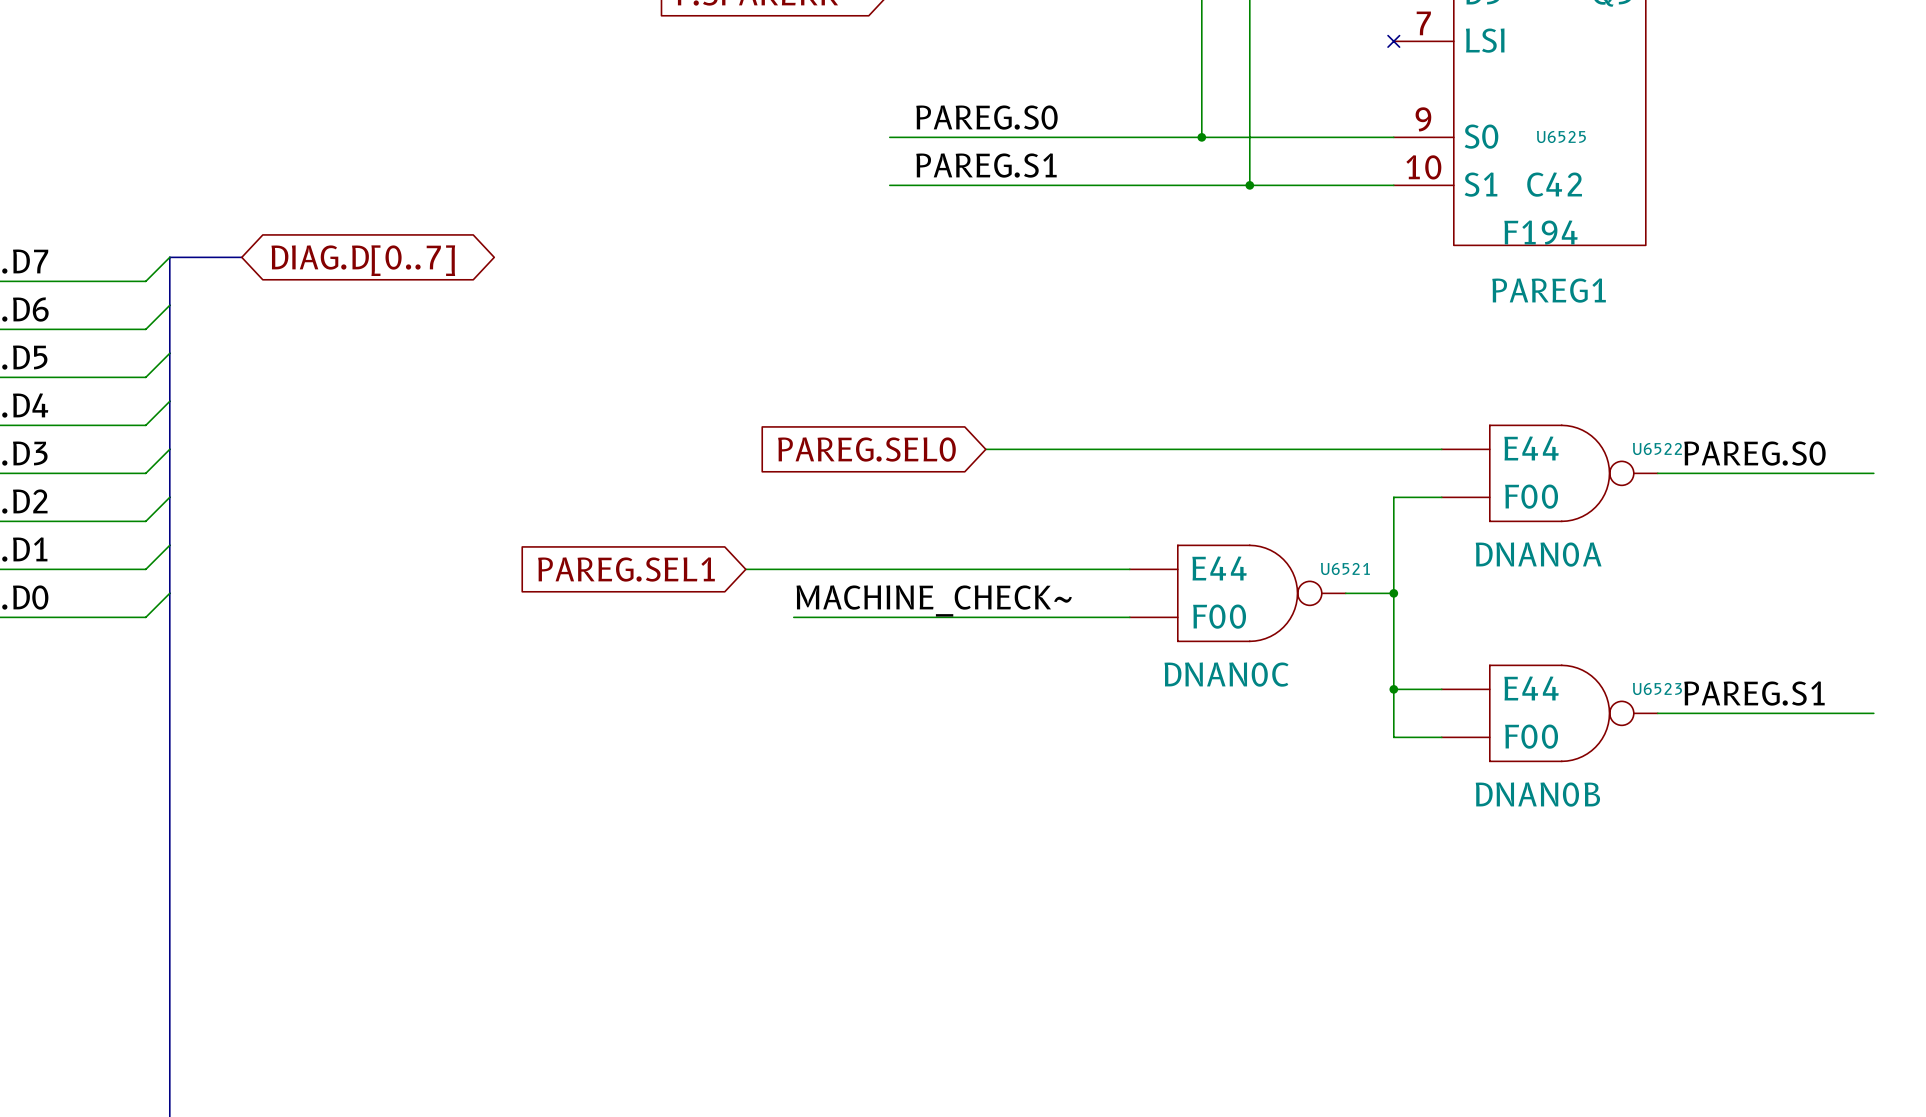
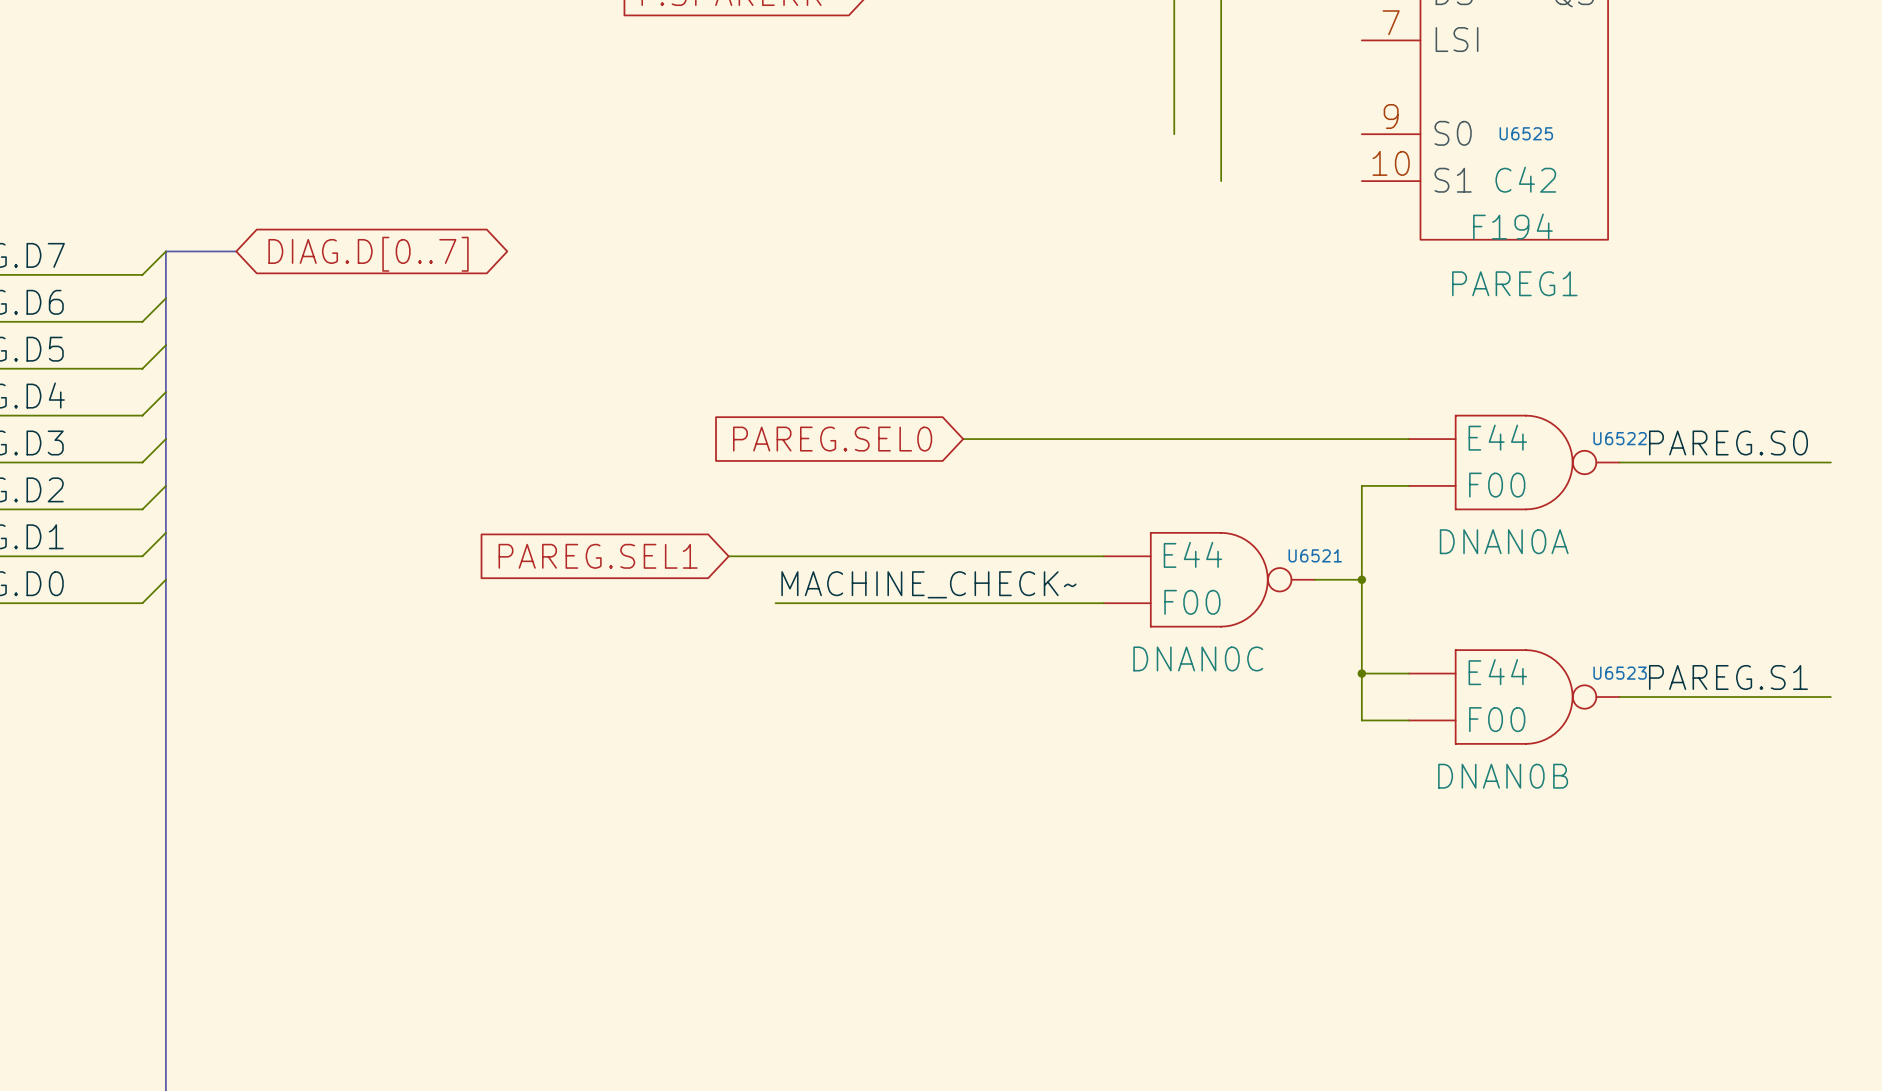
no-connect mark: (1393, 41) -> none
label: PAREG.S0 (986, 117) -> none
wire: (889, 137) (1393, 137) -> none
junction: (1201, 137) -> none
label: PAREG.S1 (986, 165) -> none
wire: (889, 185) (1393, 185) -> none
junction: (1249, 185) -> none

